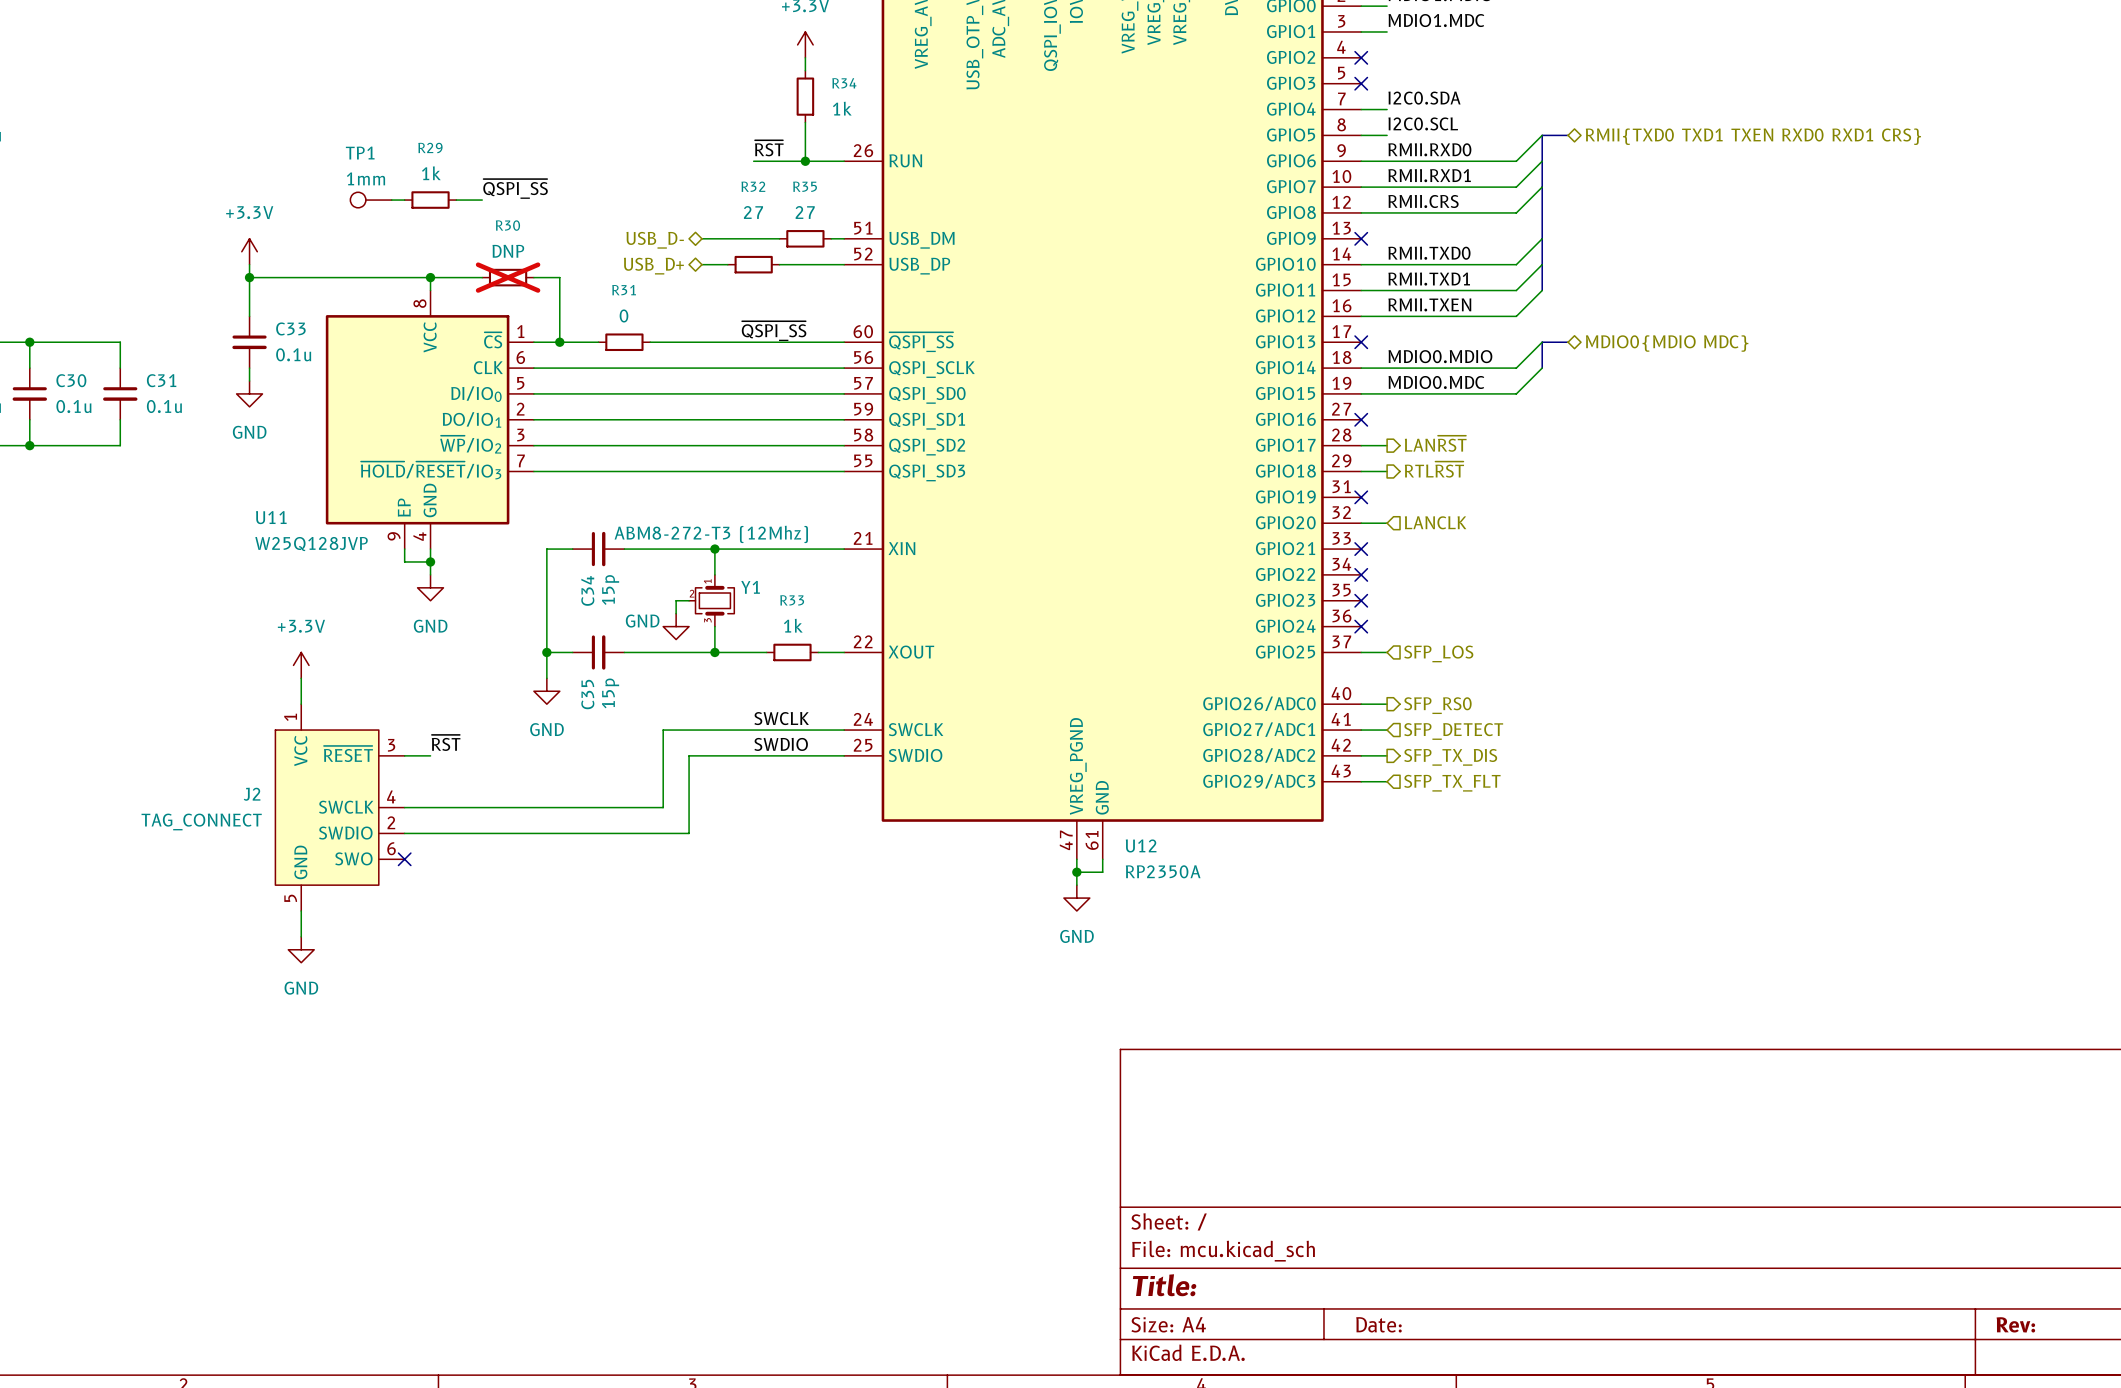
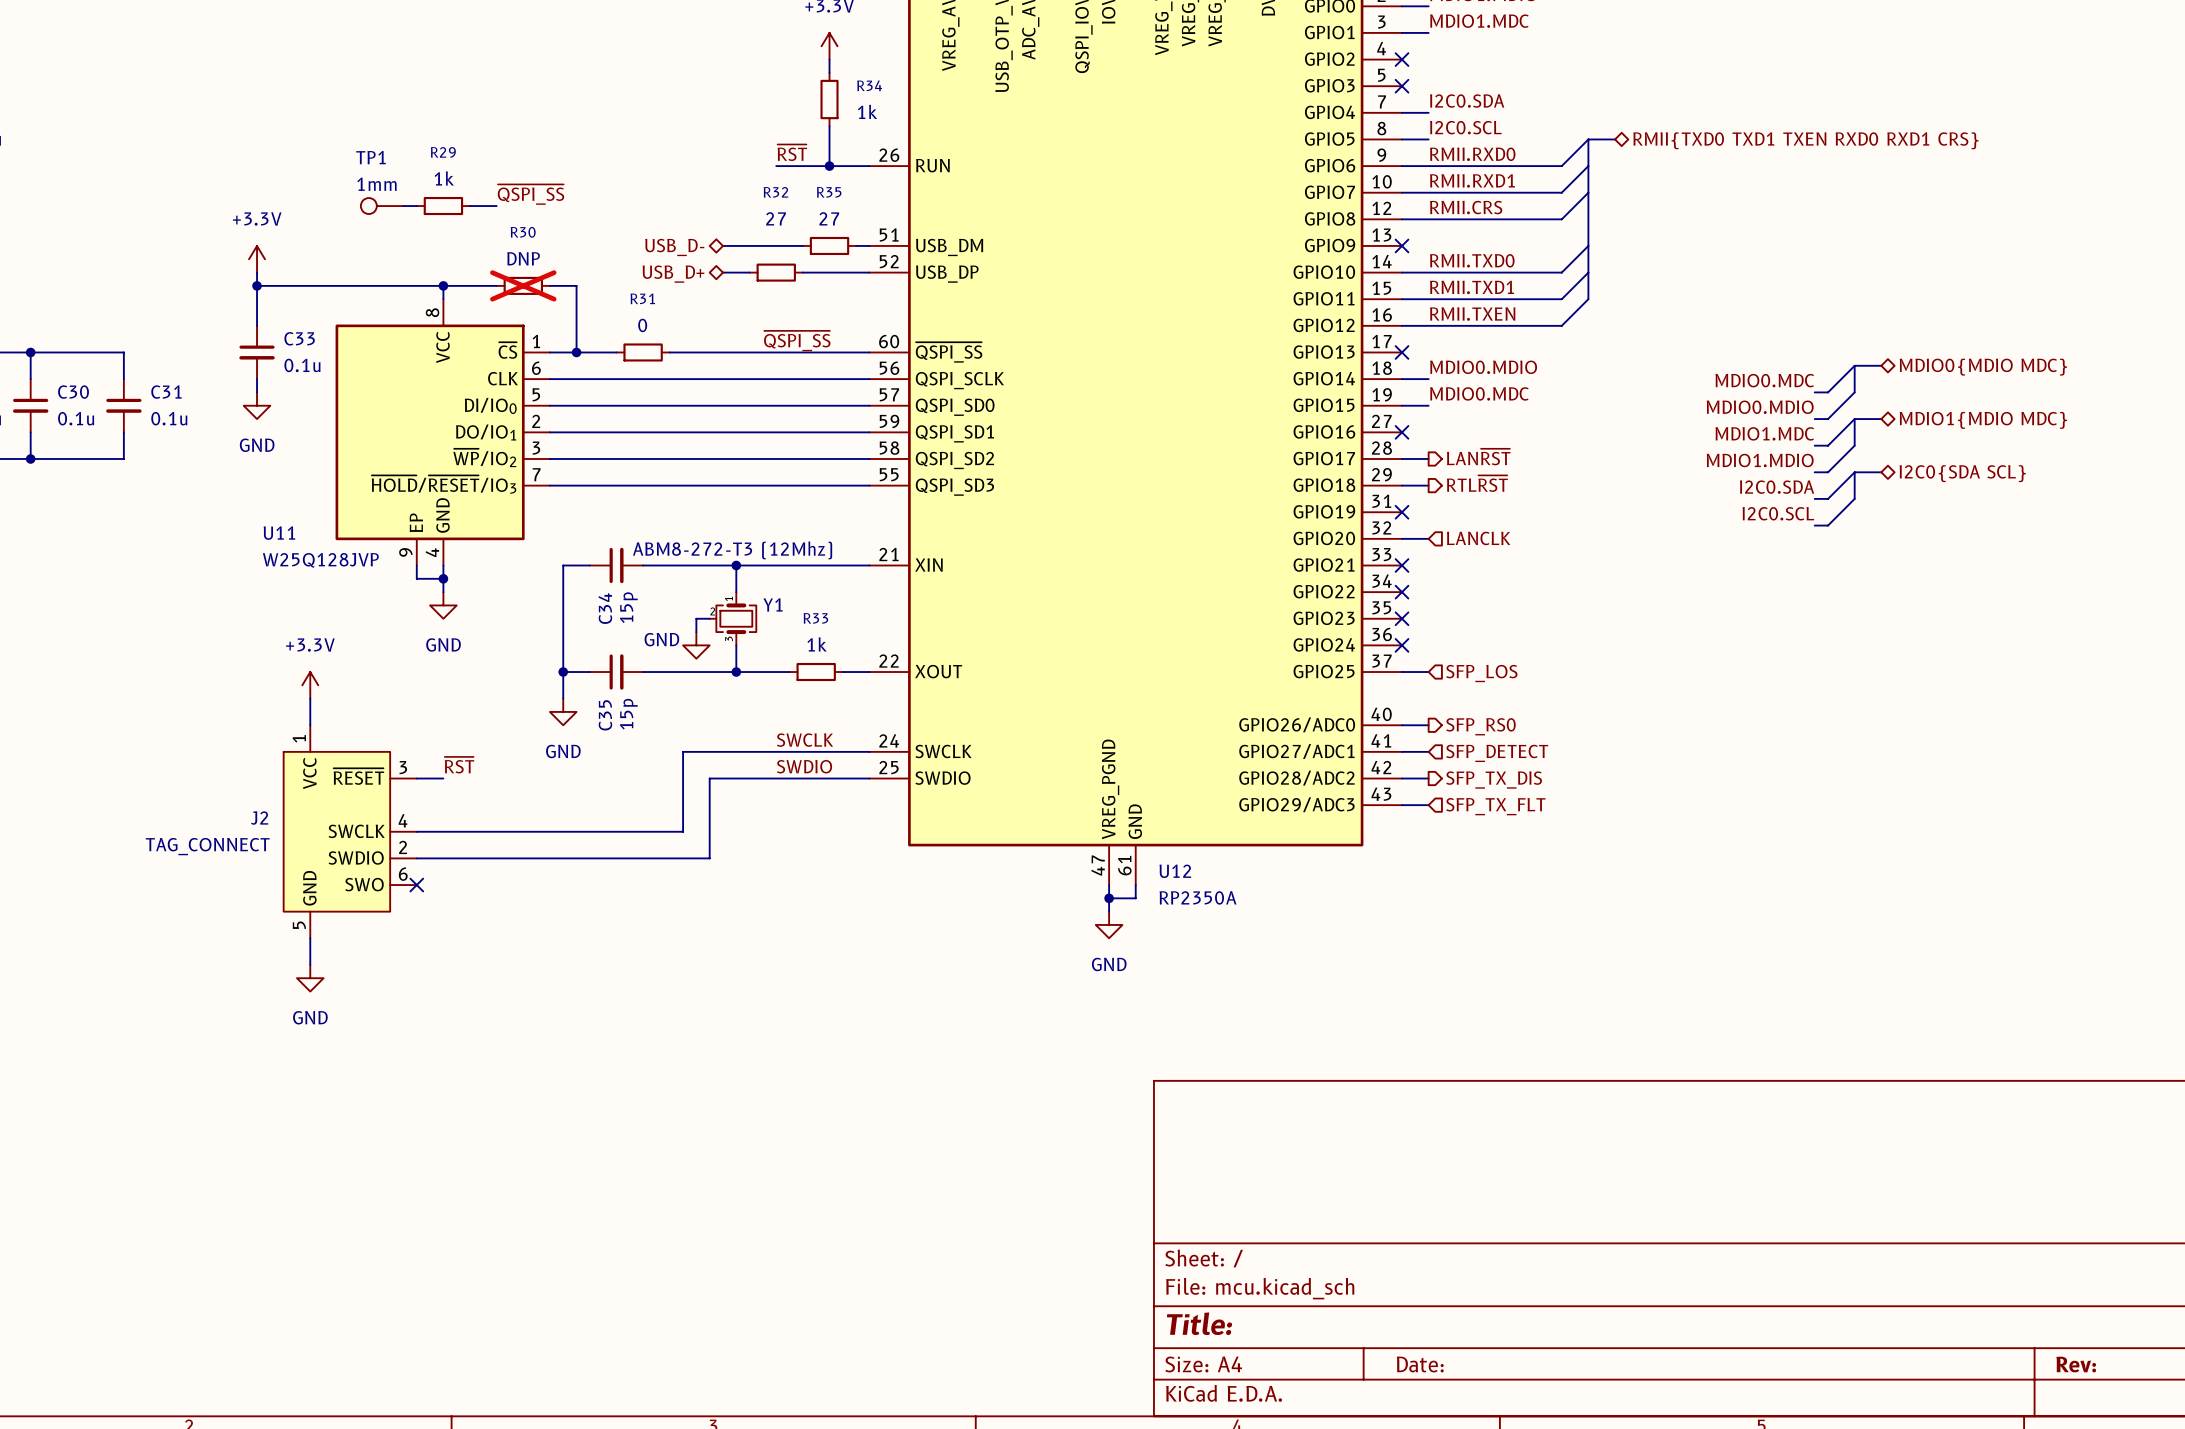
wire: (1542, 342) (1516, 368) (1387, 368) -> none
bus: (1568, 342) (1542, 342) (1542, 368) -> none
hierarchical label: MDIO0{MDIO MDC} (1667, 343) -> none
wire: none -> (1854, 365) (1828, 392) (1814, 392)
bus: none -> (1881, 365) (1854, 365) (1854, 392)
hierarchical label: none -> MDIO0{MDIO MDC} (1983, 367)
wire: (1542, 368) (1516, 393) (1387, 393) -> none
label: none -> MDIO0.MDC (1764, 380)
wire: none -> (1854, 392) (1828, 419) (1814, 419)
label: none -> MDIO0.MDIO (1760, 407)
wire: none -> (1854, 419) (1828, 445) (1814, 445)
bus: none -> (1881, 419) (1854, 419) (1854, 445)
hierarchical label: none -> MDIO1{MDIO MDC} (1983, 420)
label: none -> MDIO1.MDC (1764, 433)
wire: none -> (1854, 445) (1828, 472) (1814, 472)
label: none -> MDIO1.MDIO (1760, 460)
wire: none -> (1854, 472) (1828, 498) (1814, 498)
bus: none -> (1881, 472) (1854, 472) (1854, 498)
hierarchical label: none -> I2C0{SDA SCL} (1962, 473)
label: none -> I2C0.SDA (1777, 487)
wire: none -> (1854, 498) (1828, 525) (1814, 525)
label: none -> I2C0.SCL (1778, 513)

